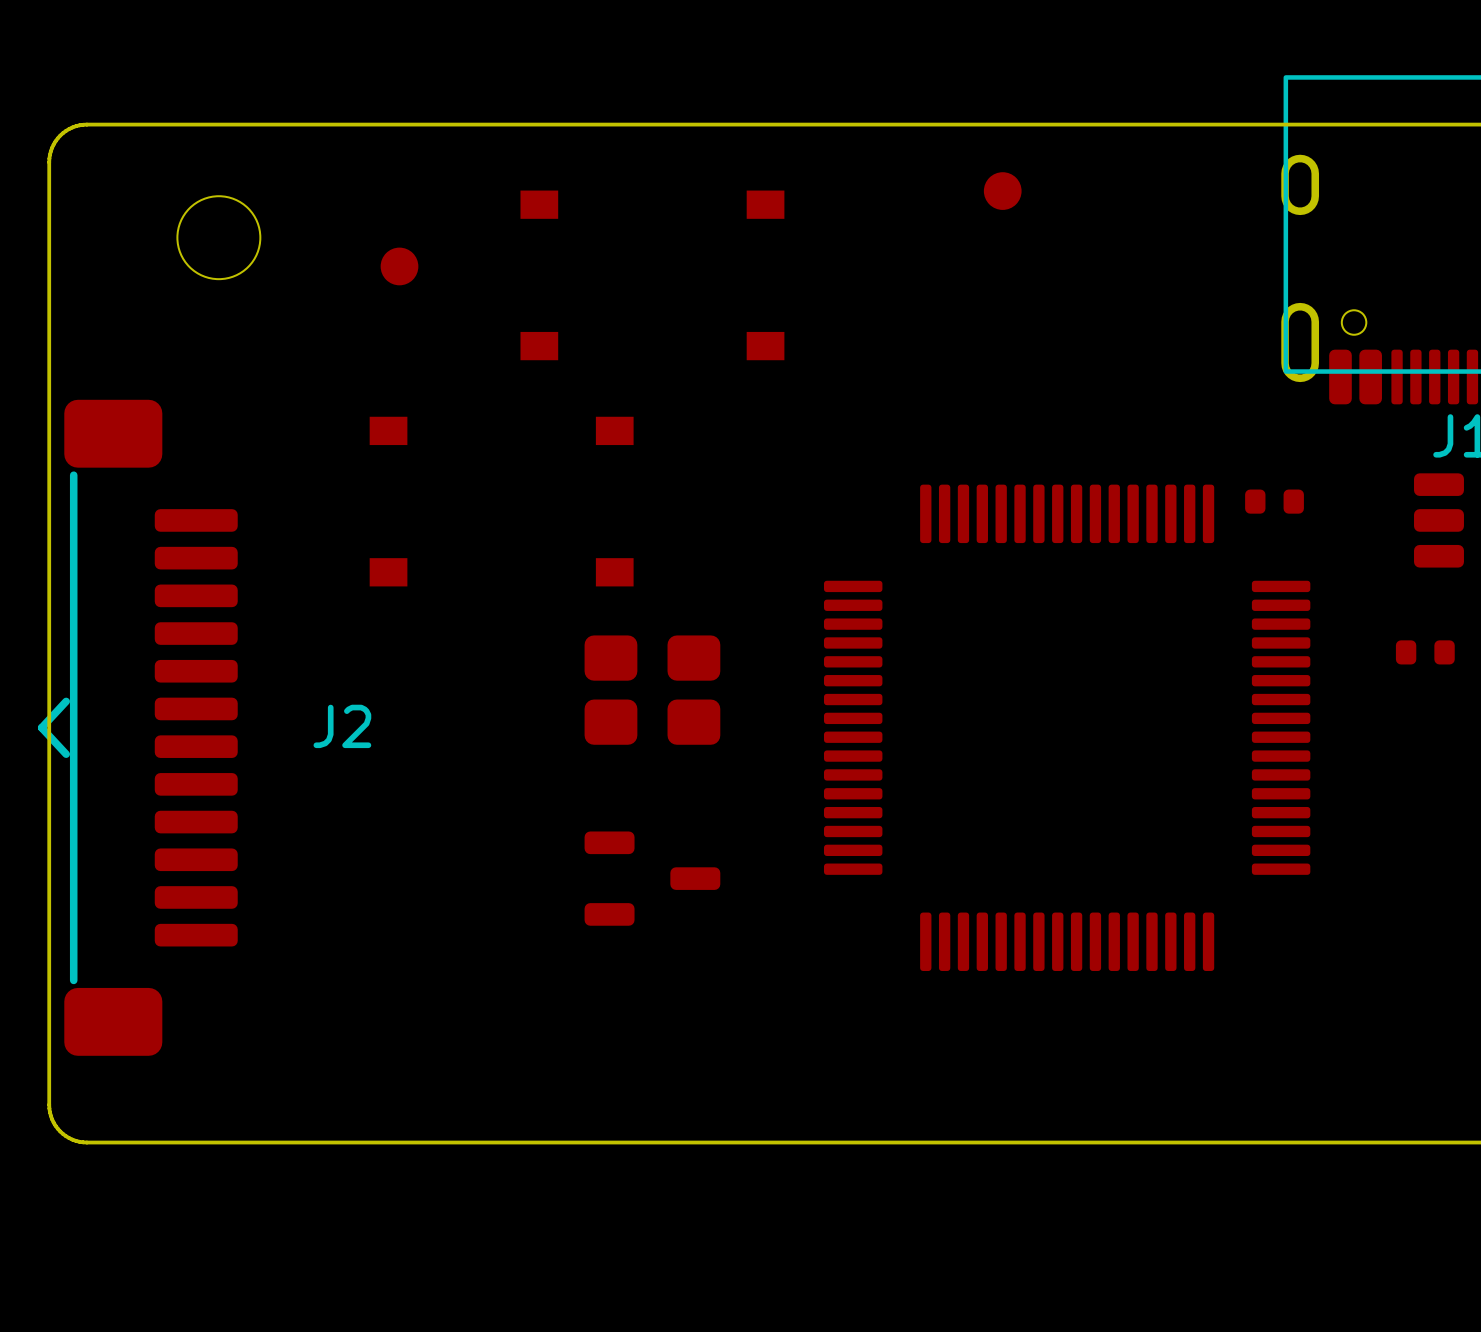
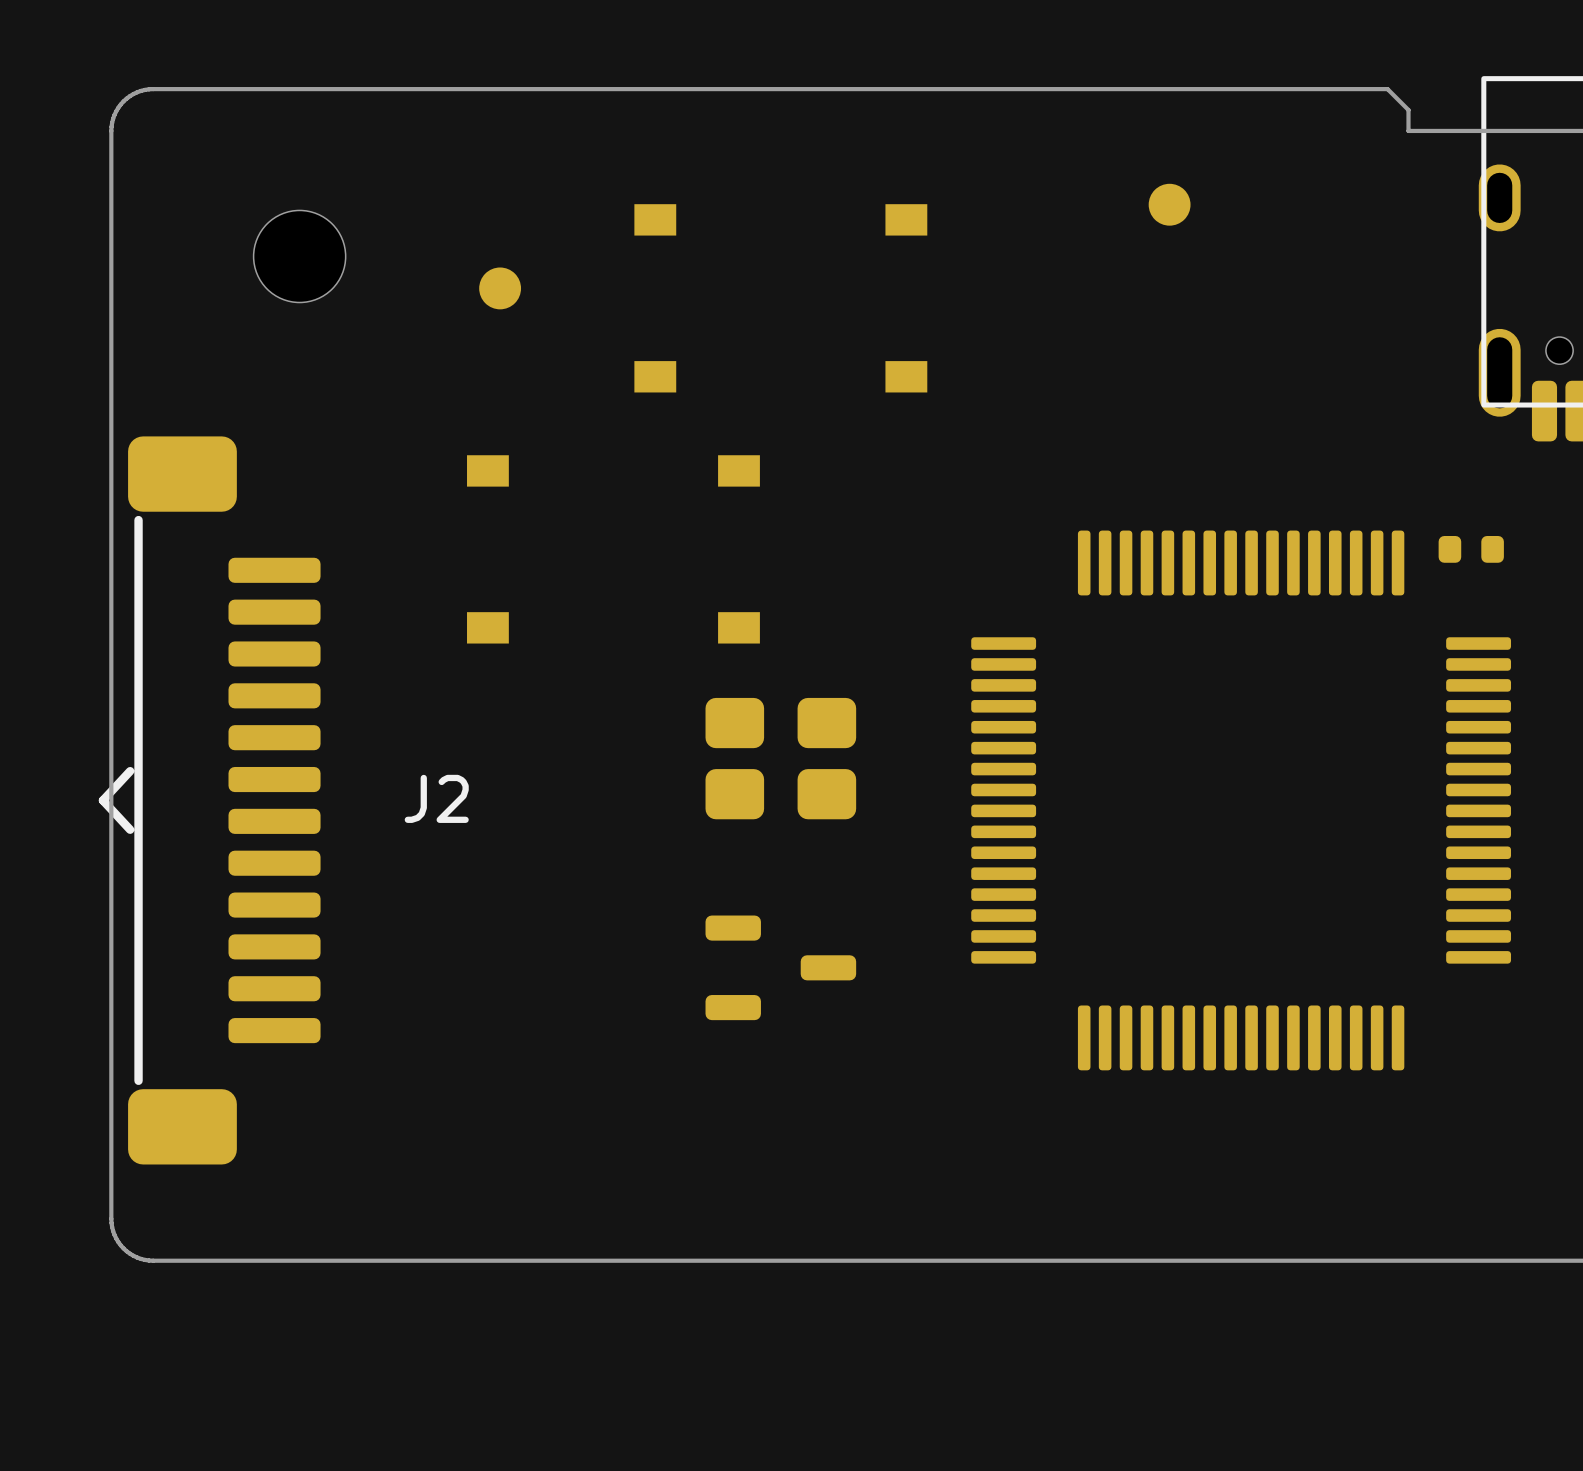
board edge: (1217, 124) (86, 124) (72, 127) (60, 135) (52, 147) (49, 162) -> (1408, 130) (1408, 110) (1387, 89) (153, 89) (133, 94) (123, 101) (116, 111) (111, 126) (111, 172)

